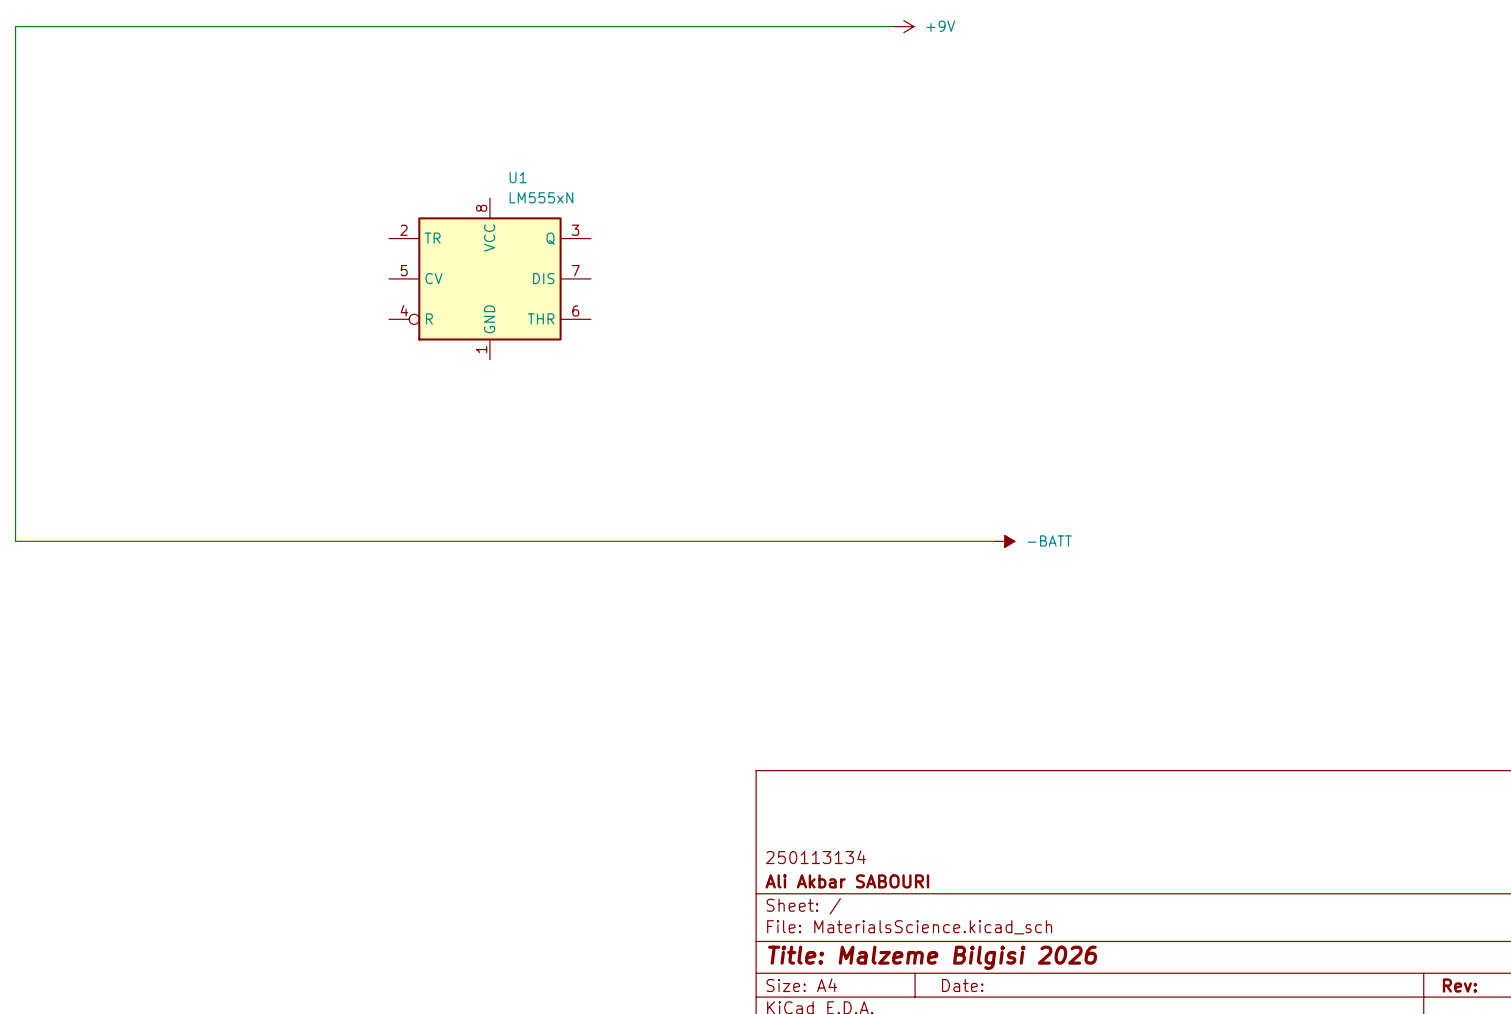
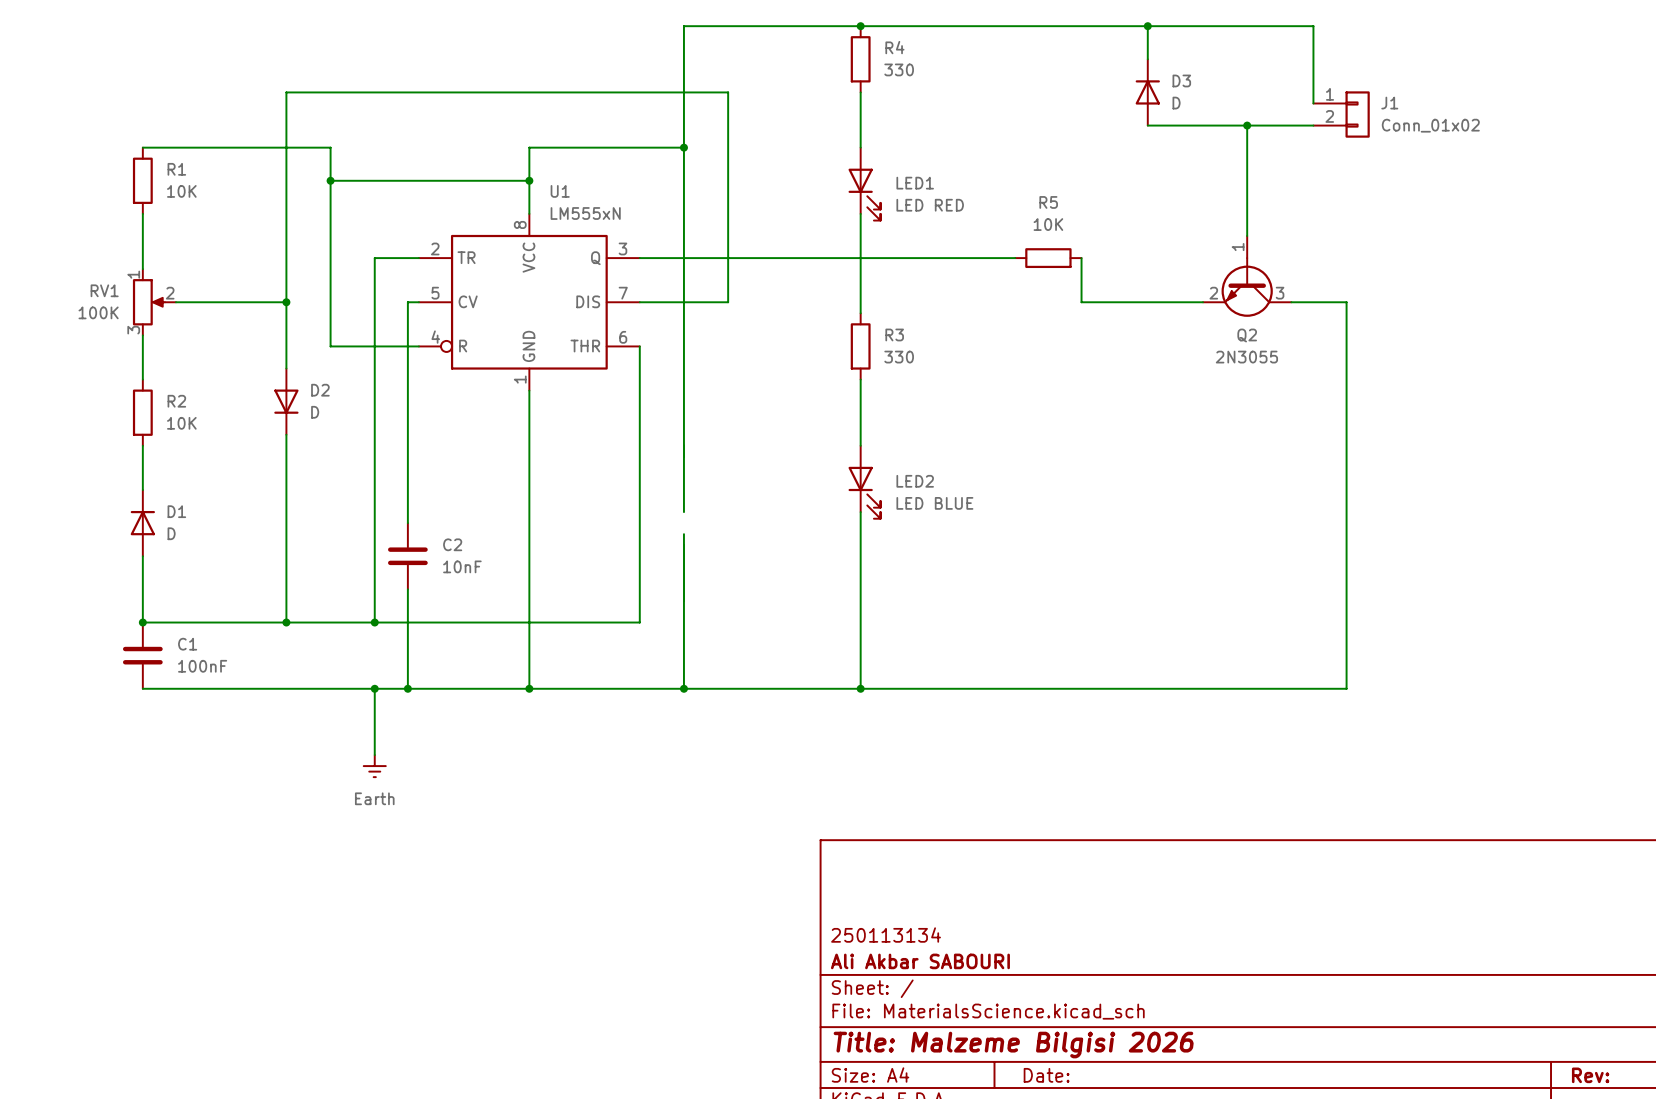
wire: (631, 26) (15, 26) (15, 541) (994, 541) -> (683, 26) (683, 512)
junction: none -> (860, 26)
wire: none -> (971, 26) (1313, 26) (1313, 103)
power symbol: +9V (903, 26) -> none
wire: none -> (1147, 26) (1147, 59)
junction: none -> (1147, 26)
R4: none -> 330 (860, 59)
wire: none -> (860, 92) (860, 147)
D3: none -> D (1147, 92)
J1: none -> Conn_01x02 (1341, 114)
wire: none -> (1147, 125) (1313, 125)
wire: none -> (1247, 125) (1247, 236)
junction: none -> (1247, 125)
wire: none -> (142, 147) (330, 147) (330, 346) (418, 346)
wire: none -> (683, 147) (529, 147) (529, 213)
junction: none -> (683, 147)
R1: none -> 10K (142, 180)
wire: none -> (330, 180) (529, 180)
junction: none -> (330, 180)
junction: none -> (529, 180)
LED1: none -> LED RED (864, 184)
wire: none -> (142, 213) (142, 269)
wire: none -> (860, 213) (860, 313)
wire: none -> (418, 258) (374, 258) (374, 622)
wire: none -> (639, 258) (1015, 258)
R5: none -> 10K (1048, 258)
wire: none -> (1081, 258) (1081, 302) (1203, 302)
Q2: none -> 2N3055 (1247, 276)
RV1: none -> 100K (154, 302)
wire: none -> (175, 302) (286, 302)
junction: none -> (286, 302)
wire: none -> (418, 302) (407, 302) (407, 523)
wire: none -> (639, 302) (728, 302) (728, 92) (286, 92) (286, 368)
wire: none -> (1291, 302) (1346, 302) (1346, 688) (142, 688)
wire: none -> (142, 335) (142, 379)
wire: none -> (639, 346) (639, 622) (142, 622) (142, 556)
R3: none -> 330 (860, 346)
wire: none -> (860, 379) (860, 445)
wire: none -> (529, 390) (529, 688)
D2: none -> D (286, 401)
R2: none -> 10K (142, 412)
wire: none -> (286, 434) (286, 622)
wire: none -> (142, 445) (142, 490)
LED2: none -> LED BLUE (864, 482)
wire: none -> (860, 512) (860, 688)
D1: none -> D (142, 523)
wire: none -> (683, 534) (683, 688)
C2: none -> 10nF (407, 556)
wire: none -> (407, 589) (407, 688)
power symbol: -BATT (1004, 541) -> none
junction: none -> (142, 622)
junction: none -> (286, 622)
junction: none -> (374, 622)
C1: none -> 100nF (142, 655)
wire: none -> (374, 688) (374, 755)
junction: none -> (374, 688)
junction: none -> (407, 688)
junction: none -> (529, 688)
junction: none -> (683, 688)
junction: none -> (860, 688)
power symbol: none -> Earth (374, 766)

